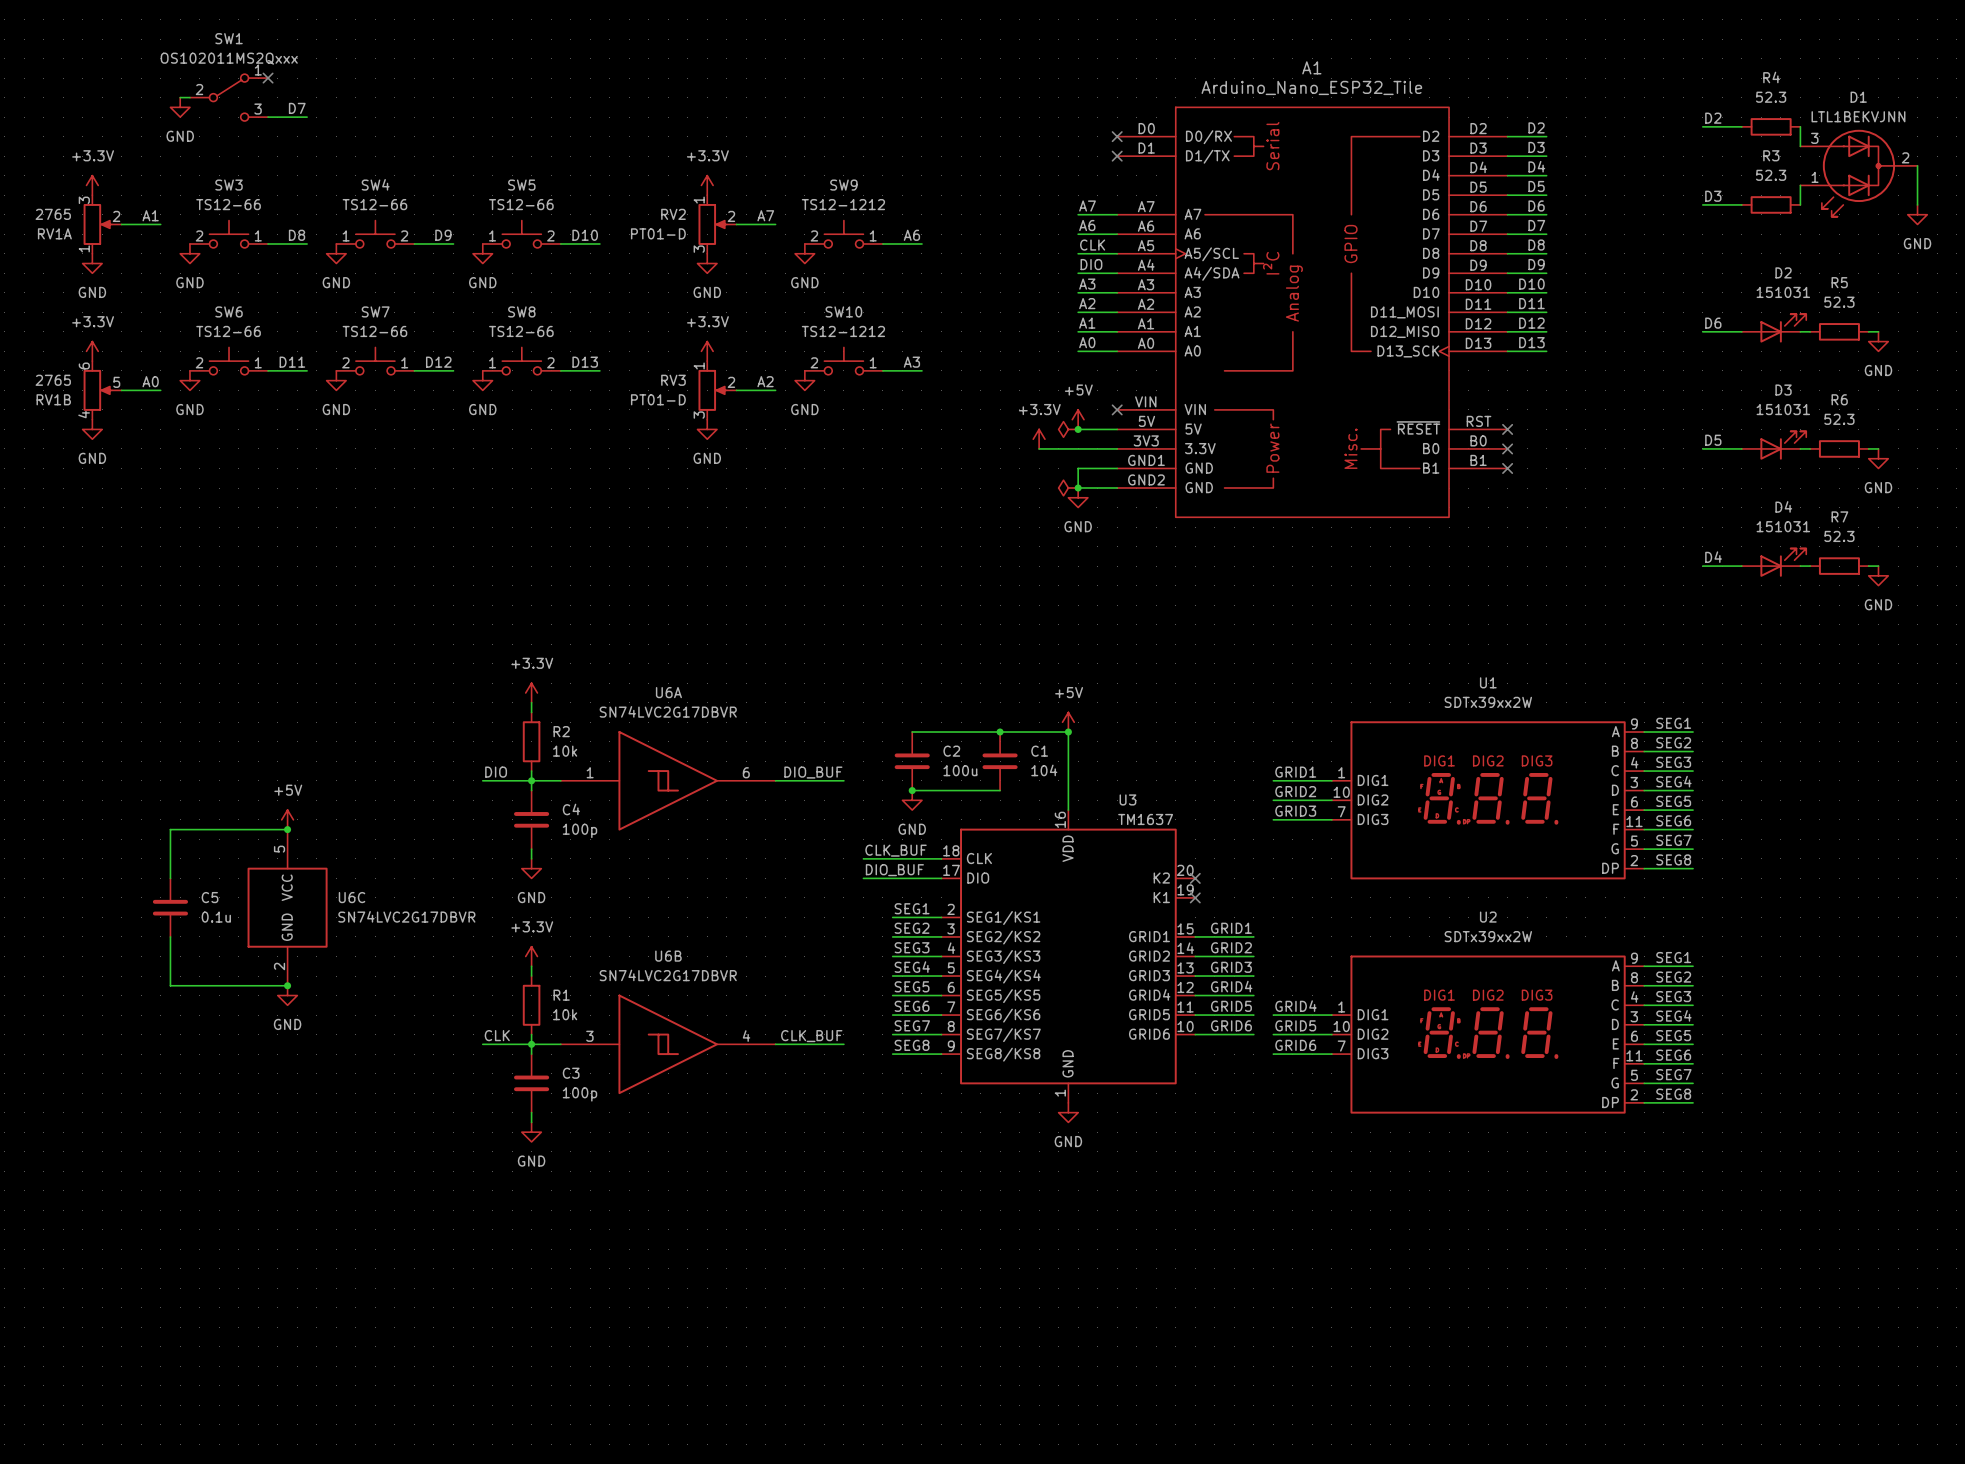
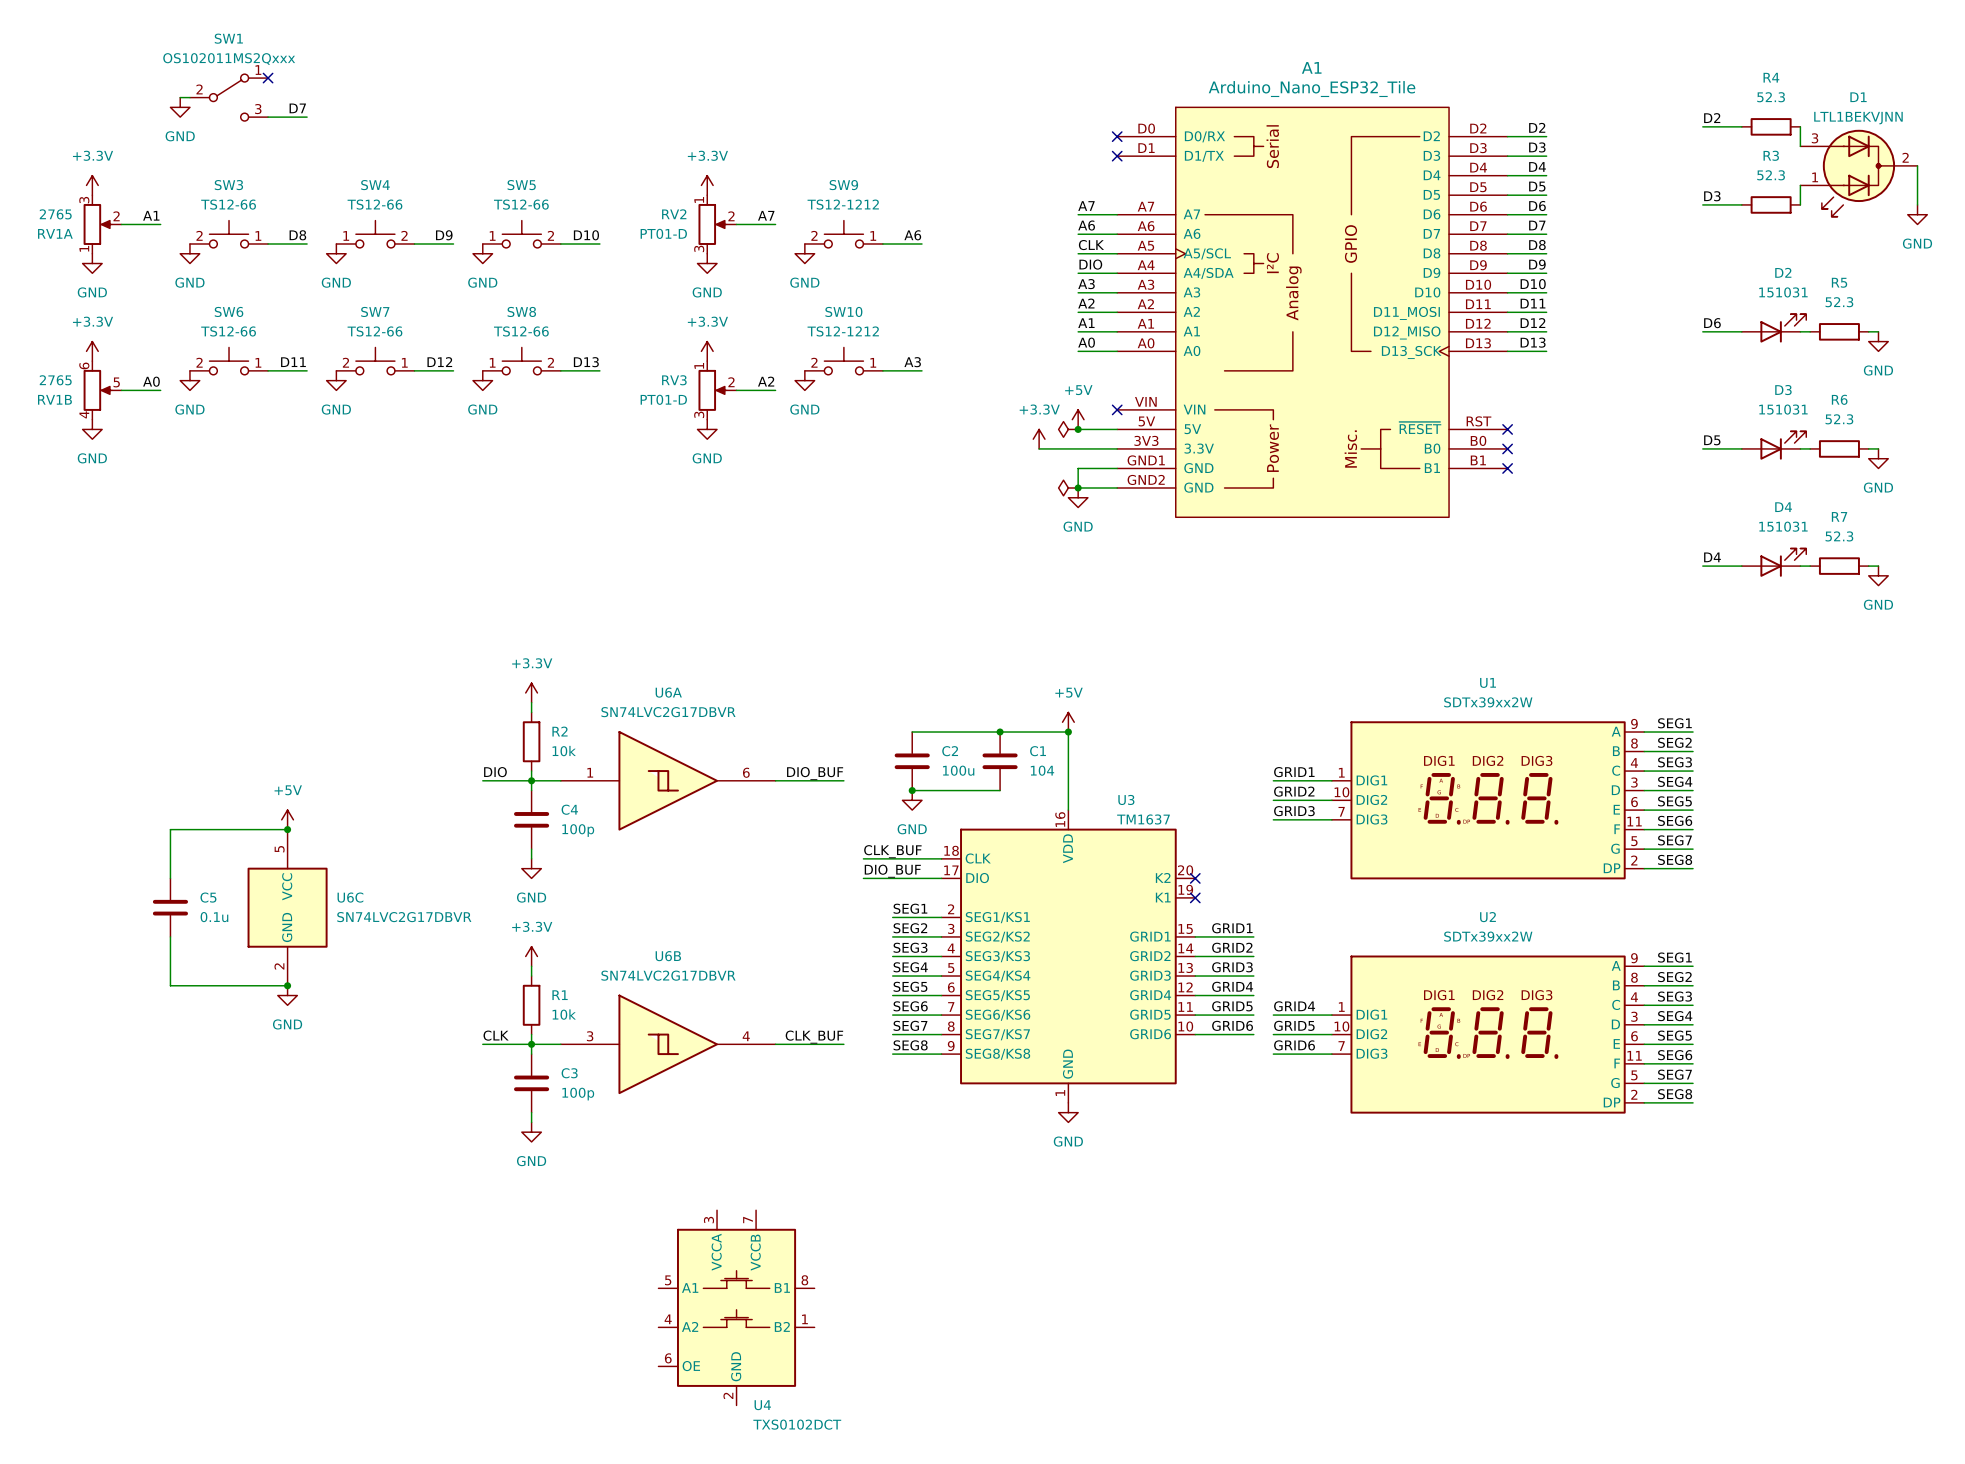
U4: none -> TXS0102DCT (736, 1307)

